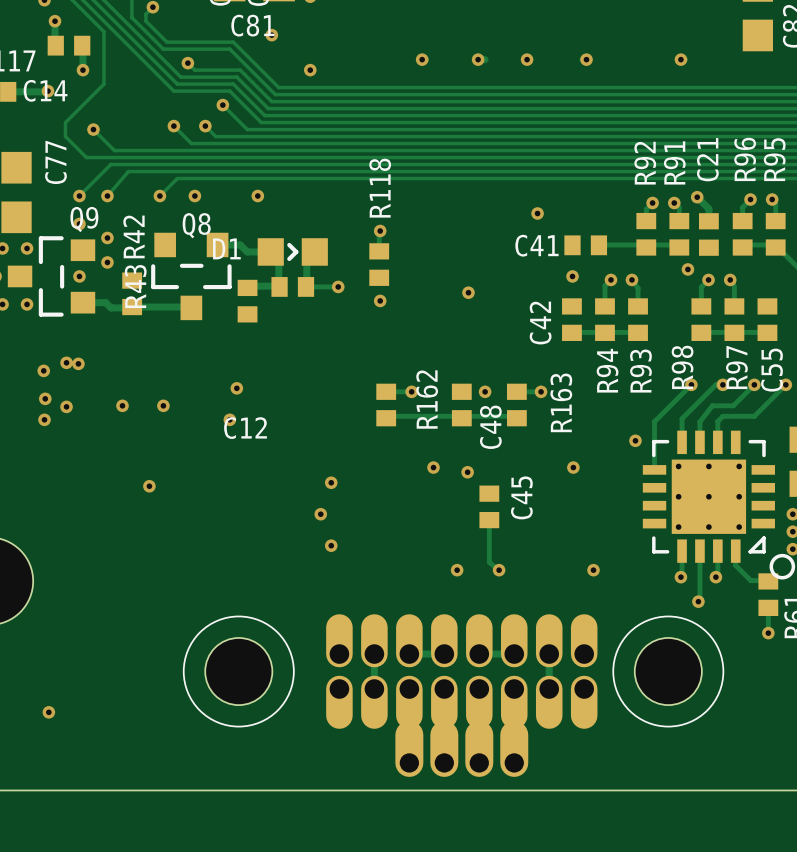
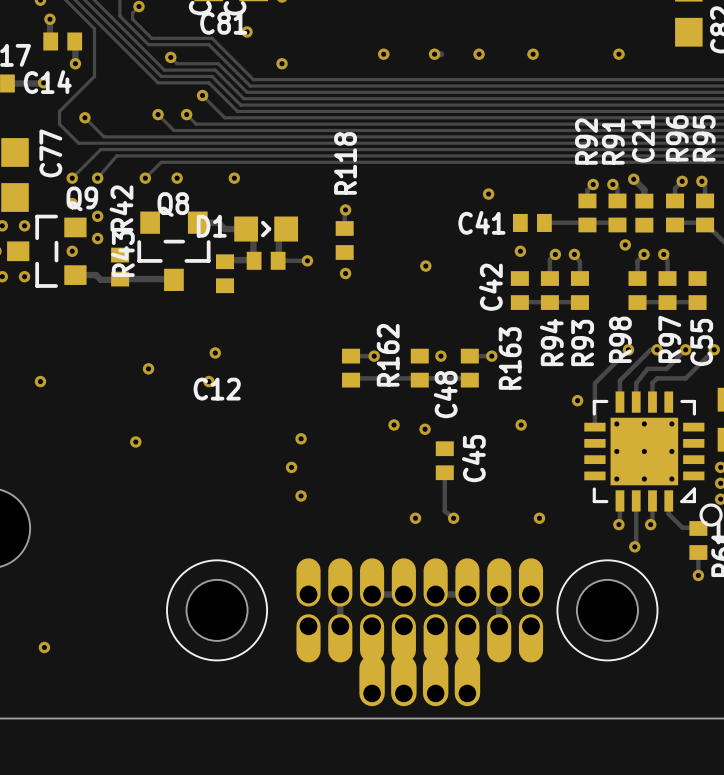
via: (66, 362) -> none
via: (78, 363) -> none
via: (43, 370) -> none
via: (45, 398) -> none
via: (122, 405) -> none
via: (66, 406) -> none

